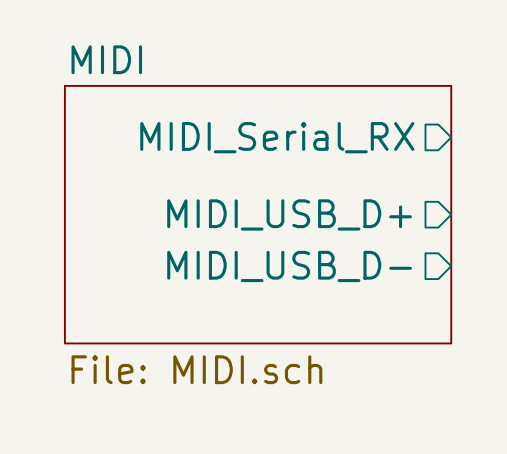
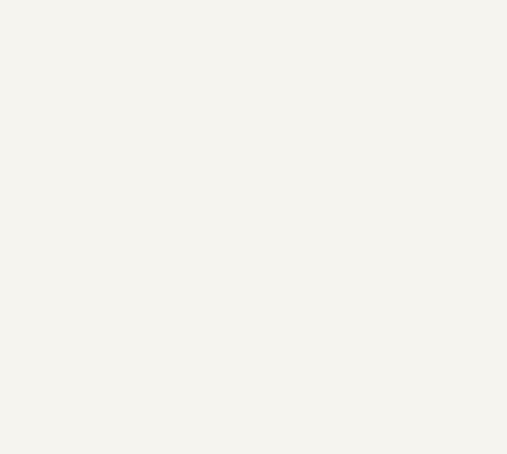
sheet pin: MIDI_Serial_RX (277, 137) -> none
sheet MIDI: File: MIDI.sch (258, 214) -> none
sheet pin: MIDI_USB_D+ (289, 214) -> none
sheet pin: MIDI_USB_D- (289, 266) -> none

